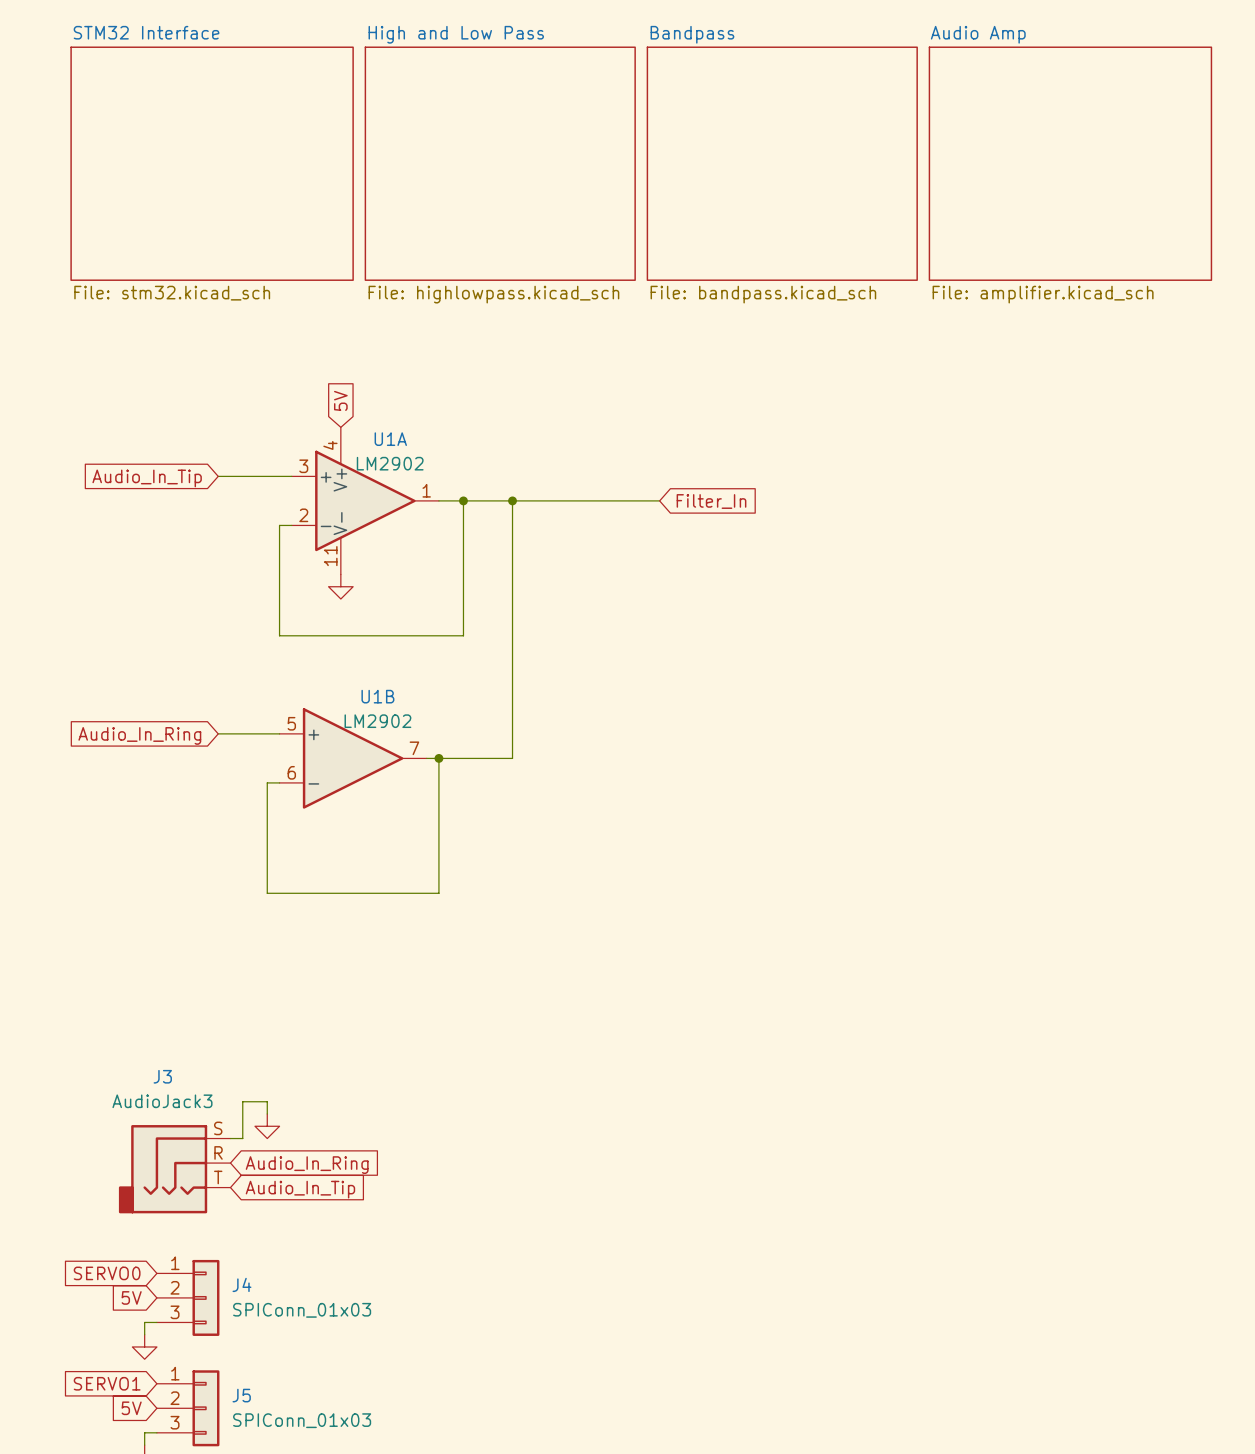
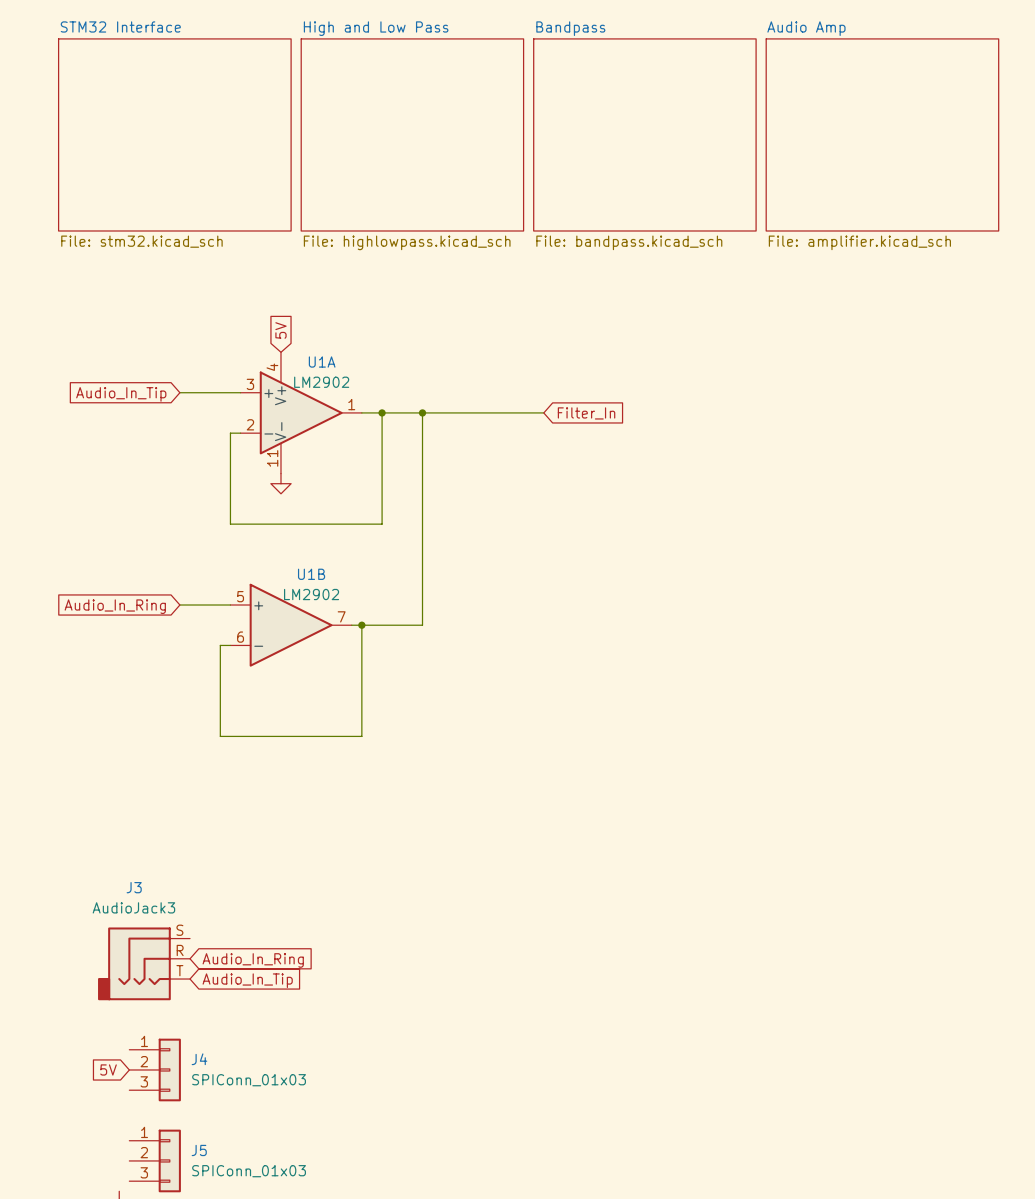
wire: (267, 1114) (267, 1101) (242, 1101) (242, 1138) (230, 1138) -> none
power symbol: (267, 1126) -> none
global label: SERVO0 (107, 1273) -> none
wire: (156, 1322) (144, 1322) (144, 1334) -> none
power symbol: (144, 1346) -> none
global label: SERVO1 (107, 1383) -> none
global label: 5V (131, 1408) -> none
wire: (156, 1432) (144, 1432) (144, 1445) -> none

